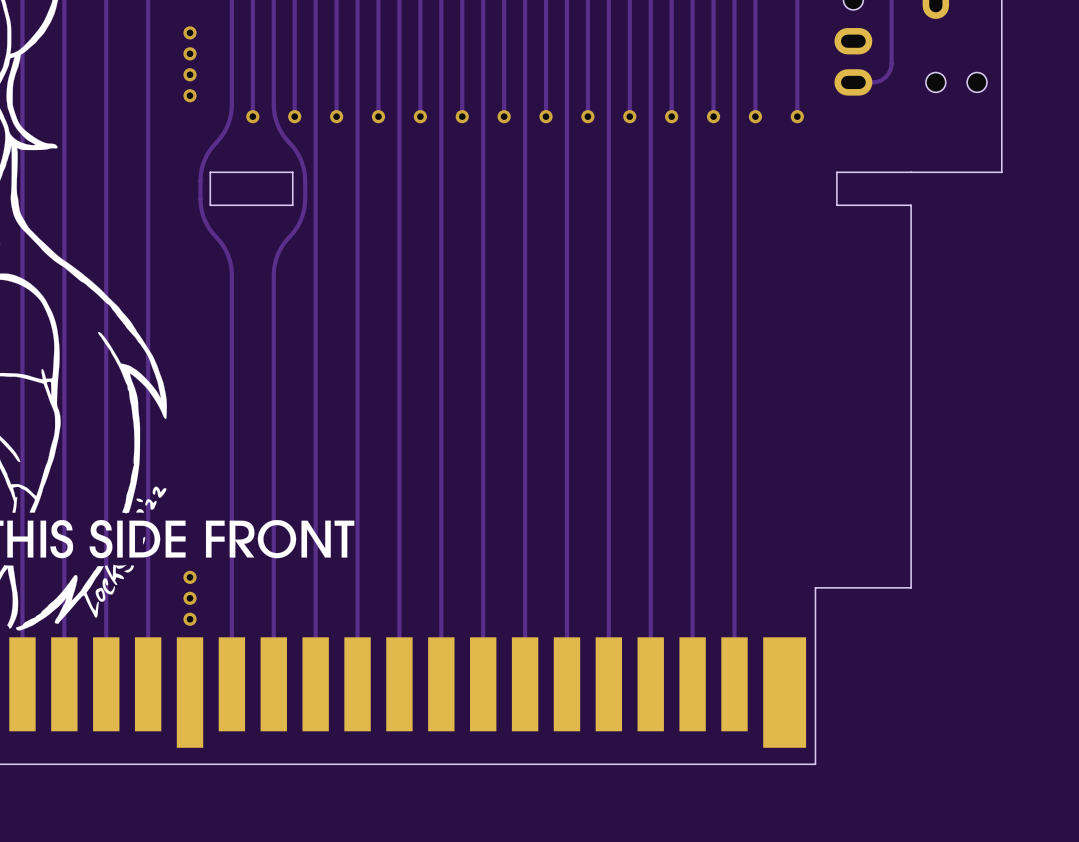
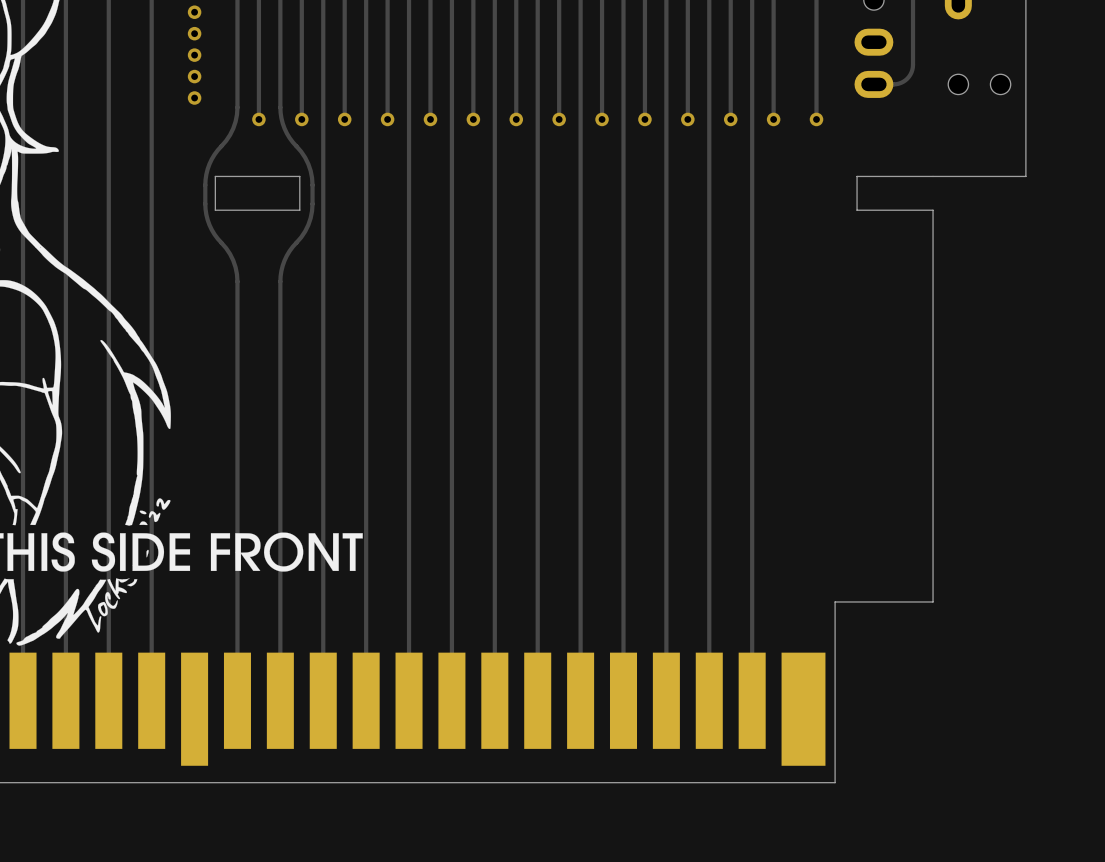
via: none -> (194, 12)
via: (190, 577) -> none
via: (190, 598) -> none
via: (190, 619) -> none

